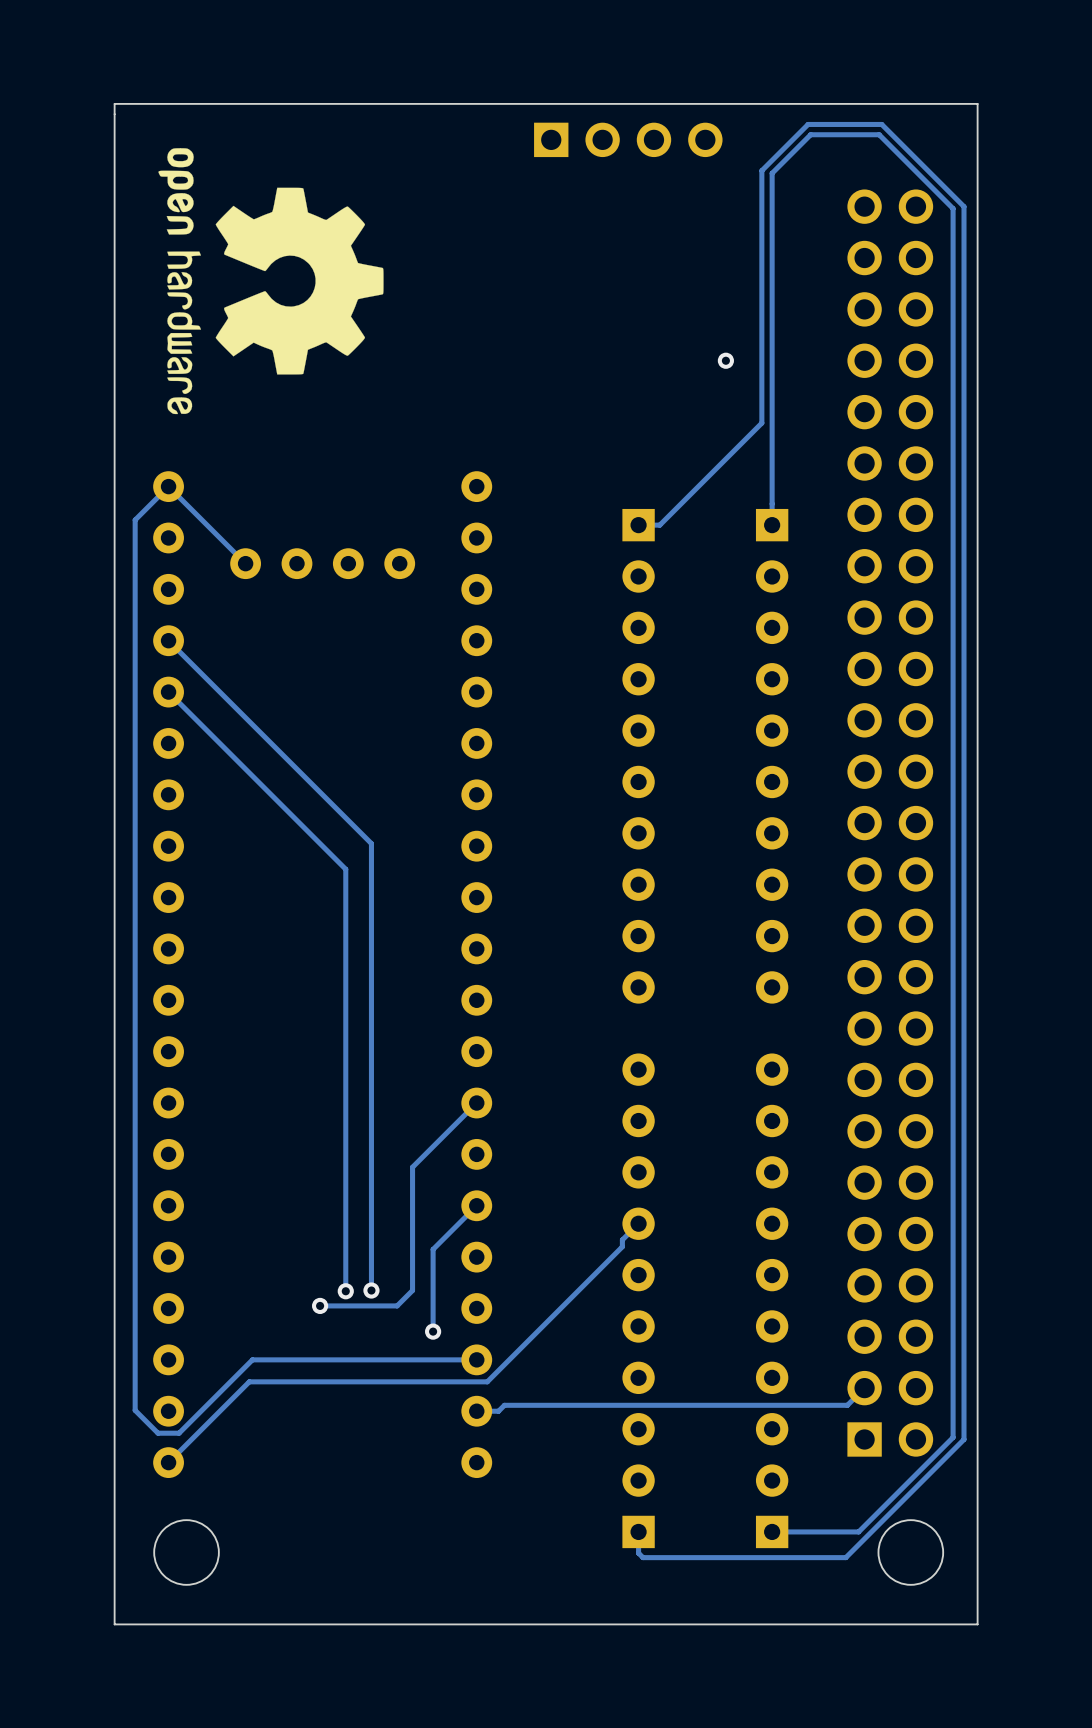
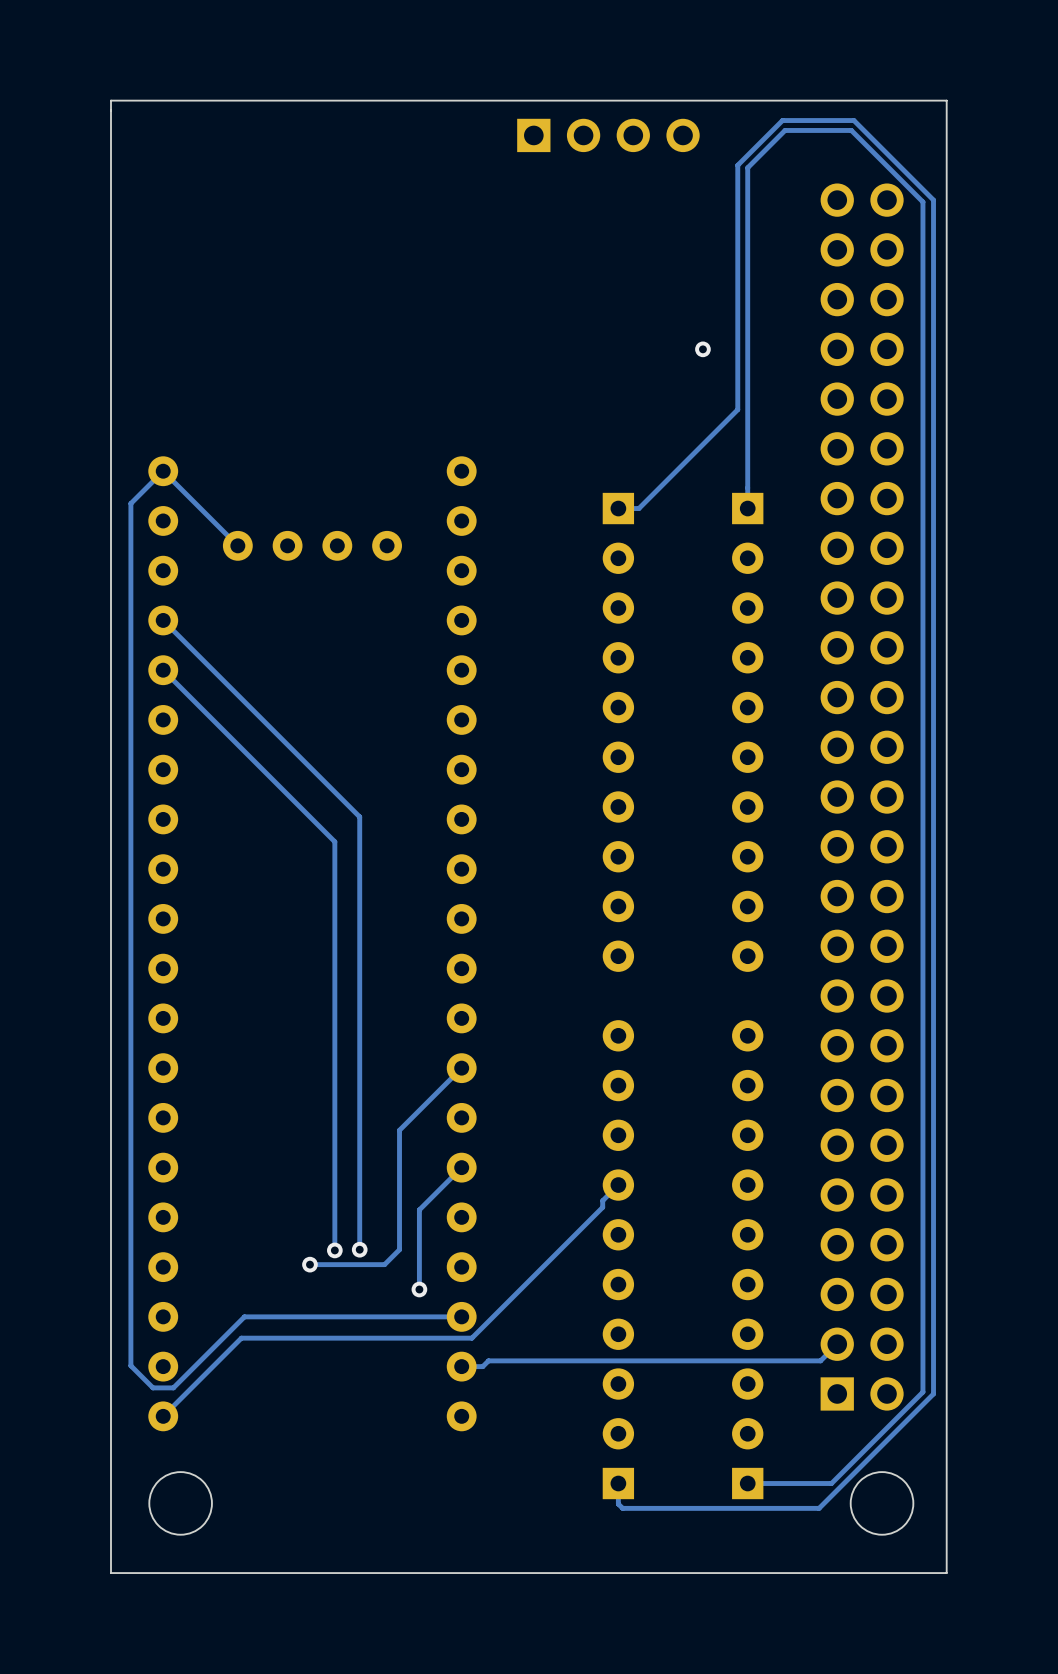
drawing: [158, 148, 384, 415] -> none

